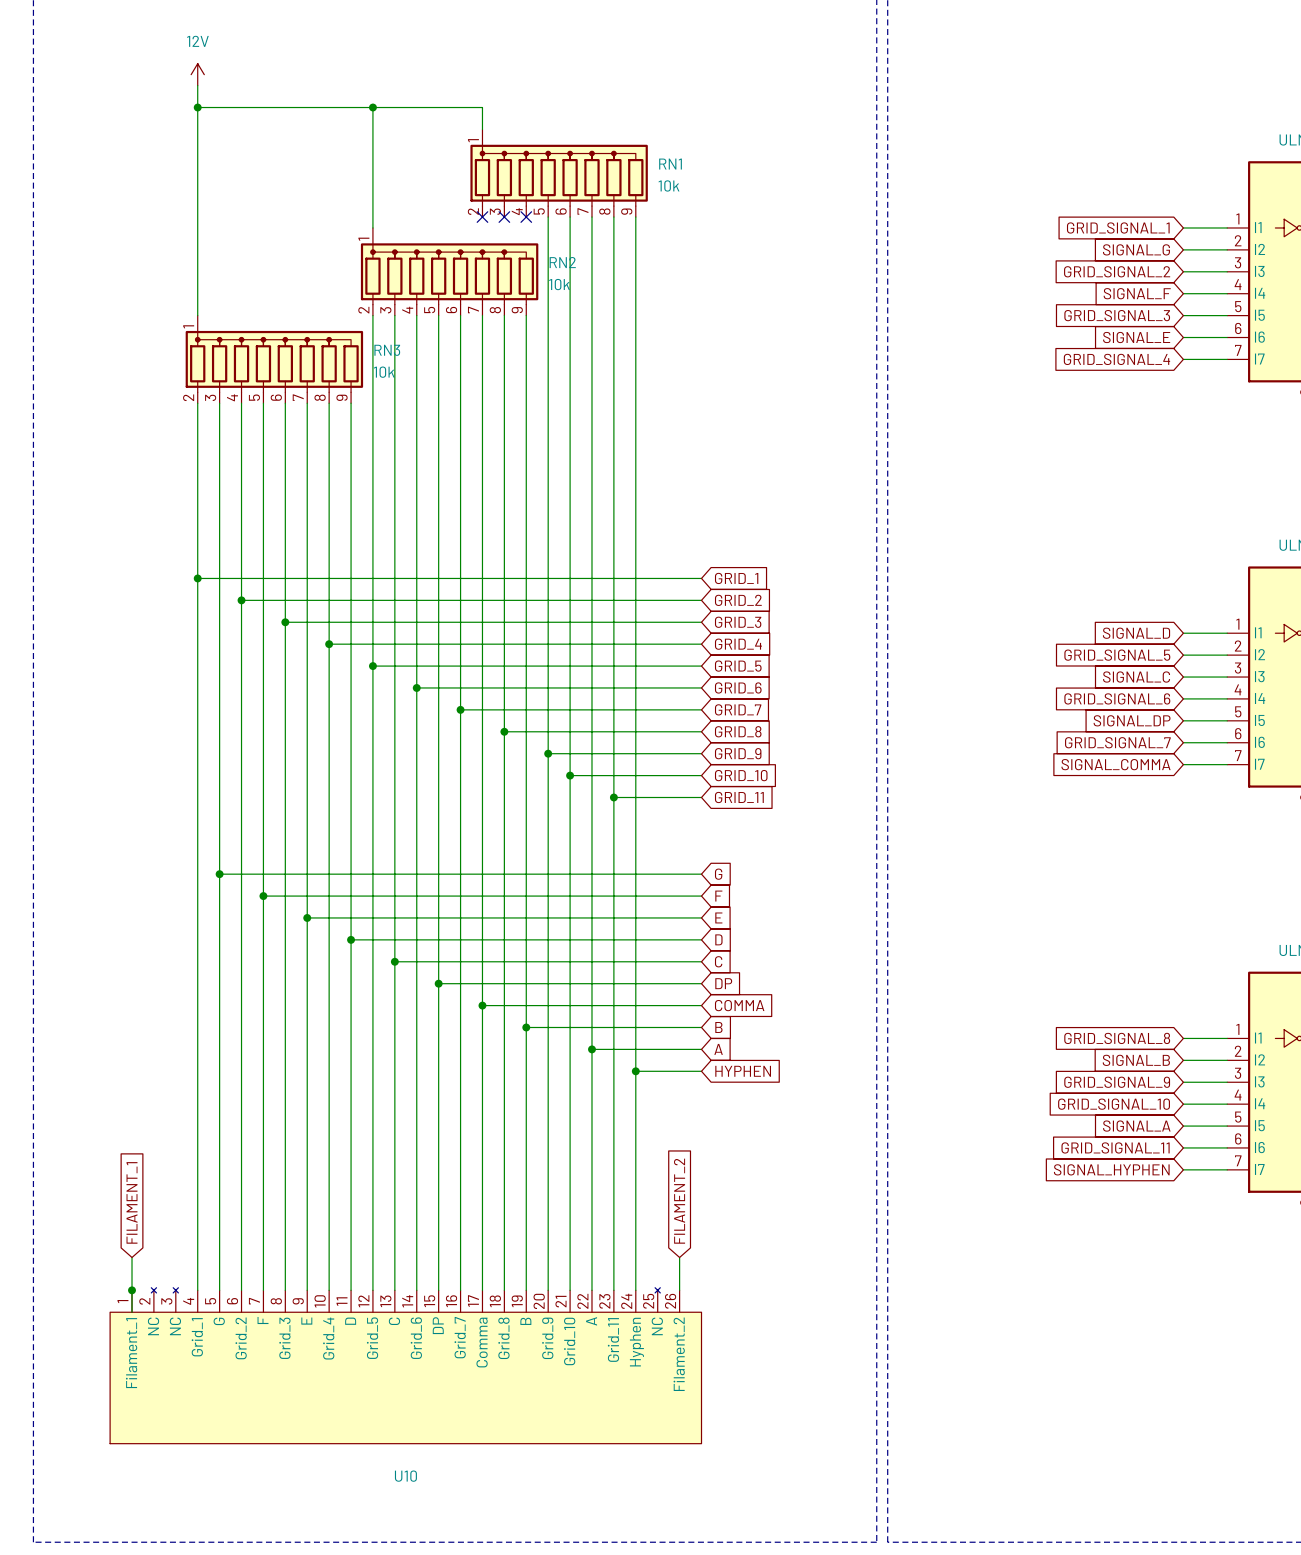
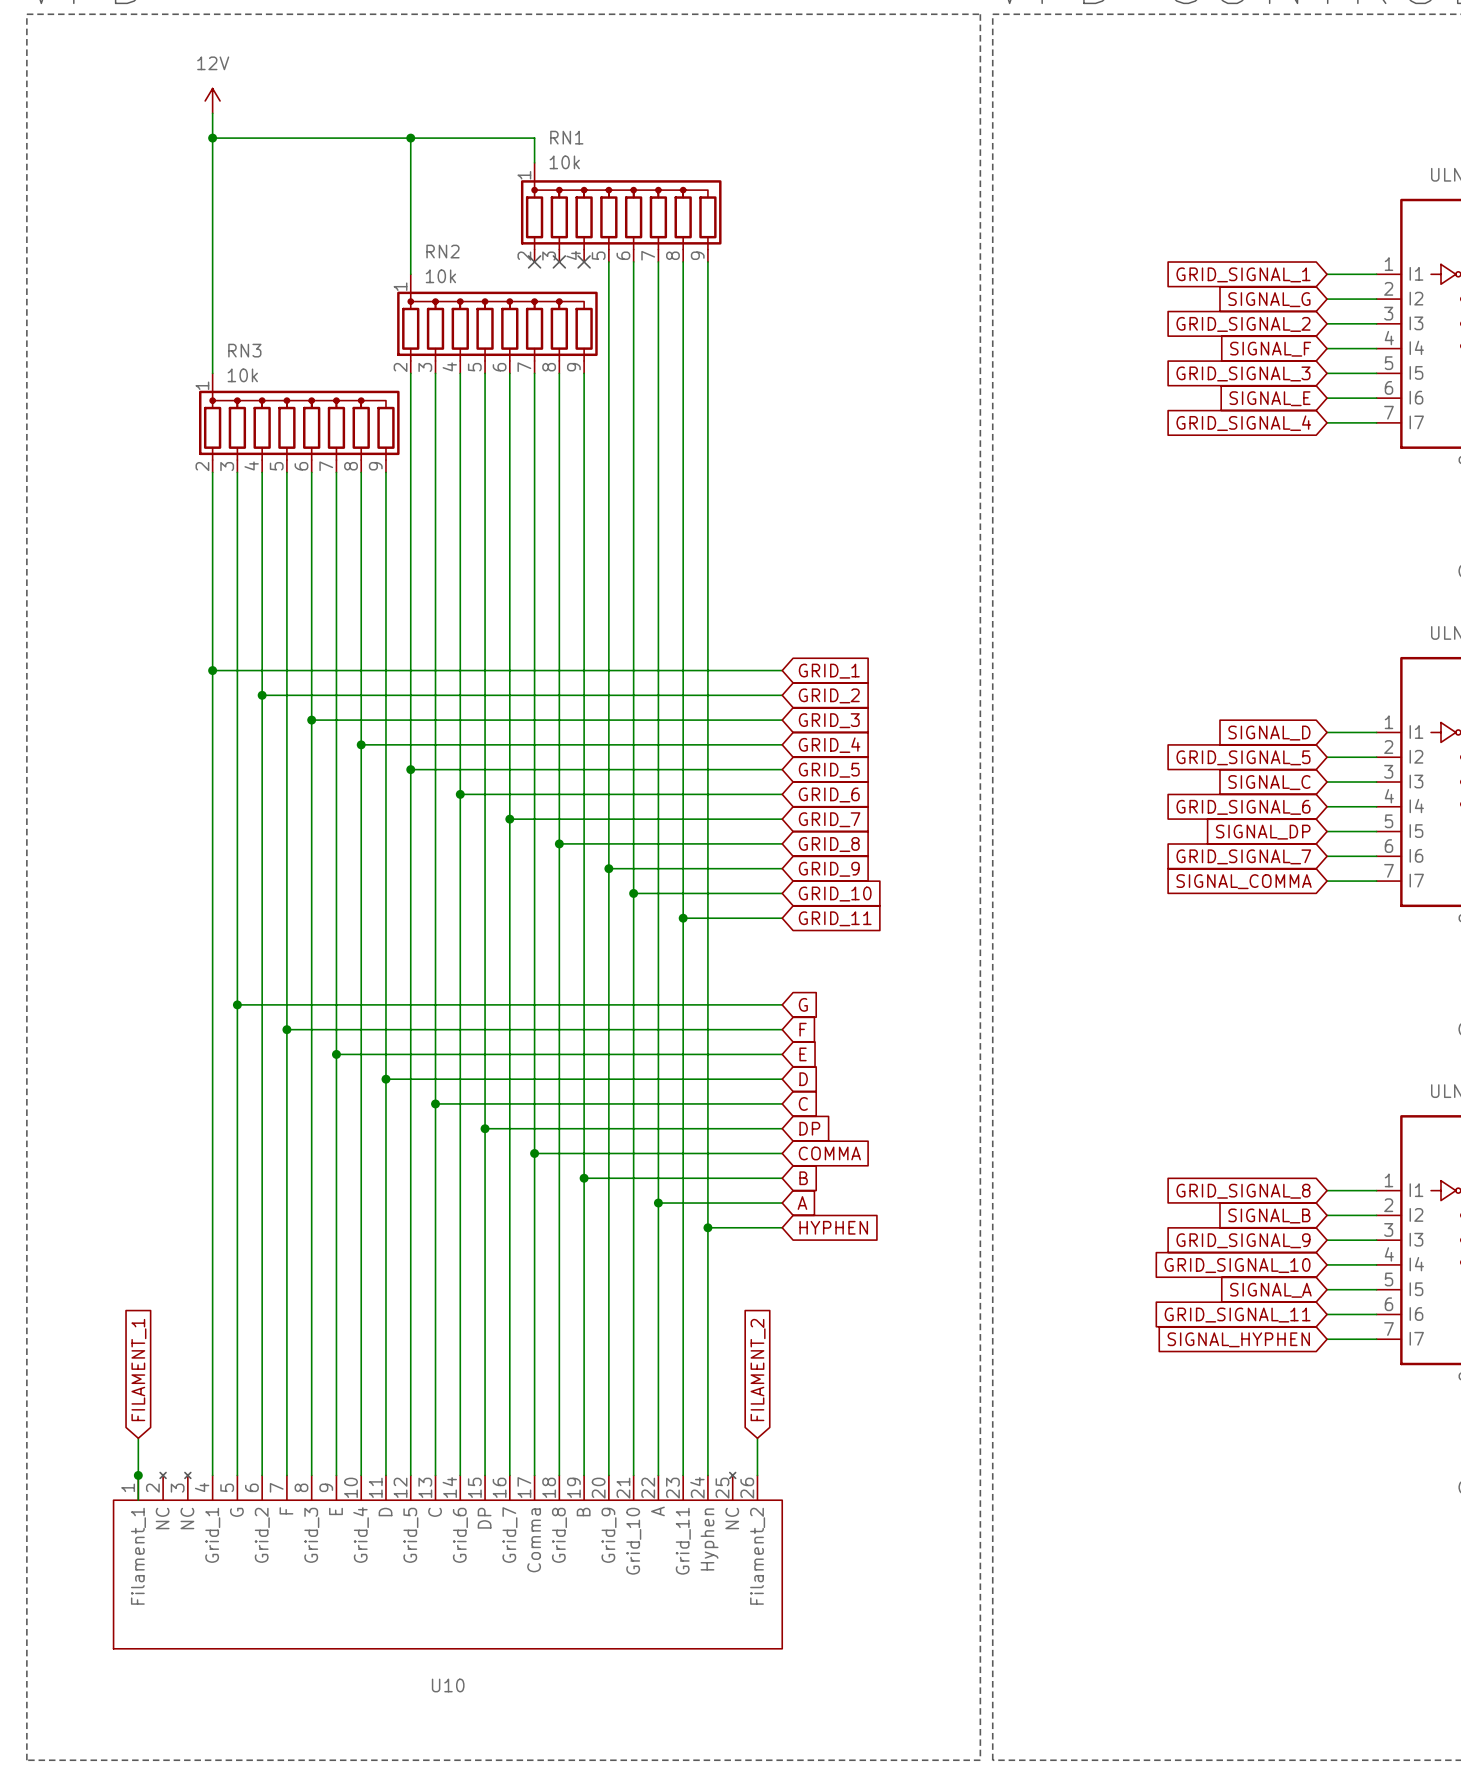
RN1 name position: RN1 (670, 164) -> RN1 (566, 137)
RN1 value position: 10k (669, 185) -> 10k (564, 162)
RN2 name position: RN2 (562, 262) -> RN2 (442, 251)
RN2 value position: 10k (559, 284) -> 10k (440, 276)
RN3 name position: RN3 (387, 350) -> RN3 (244, 350)
RN3 value position: 10k (384, 372) -> 10k (242, 375)

